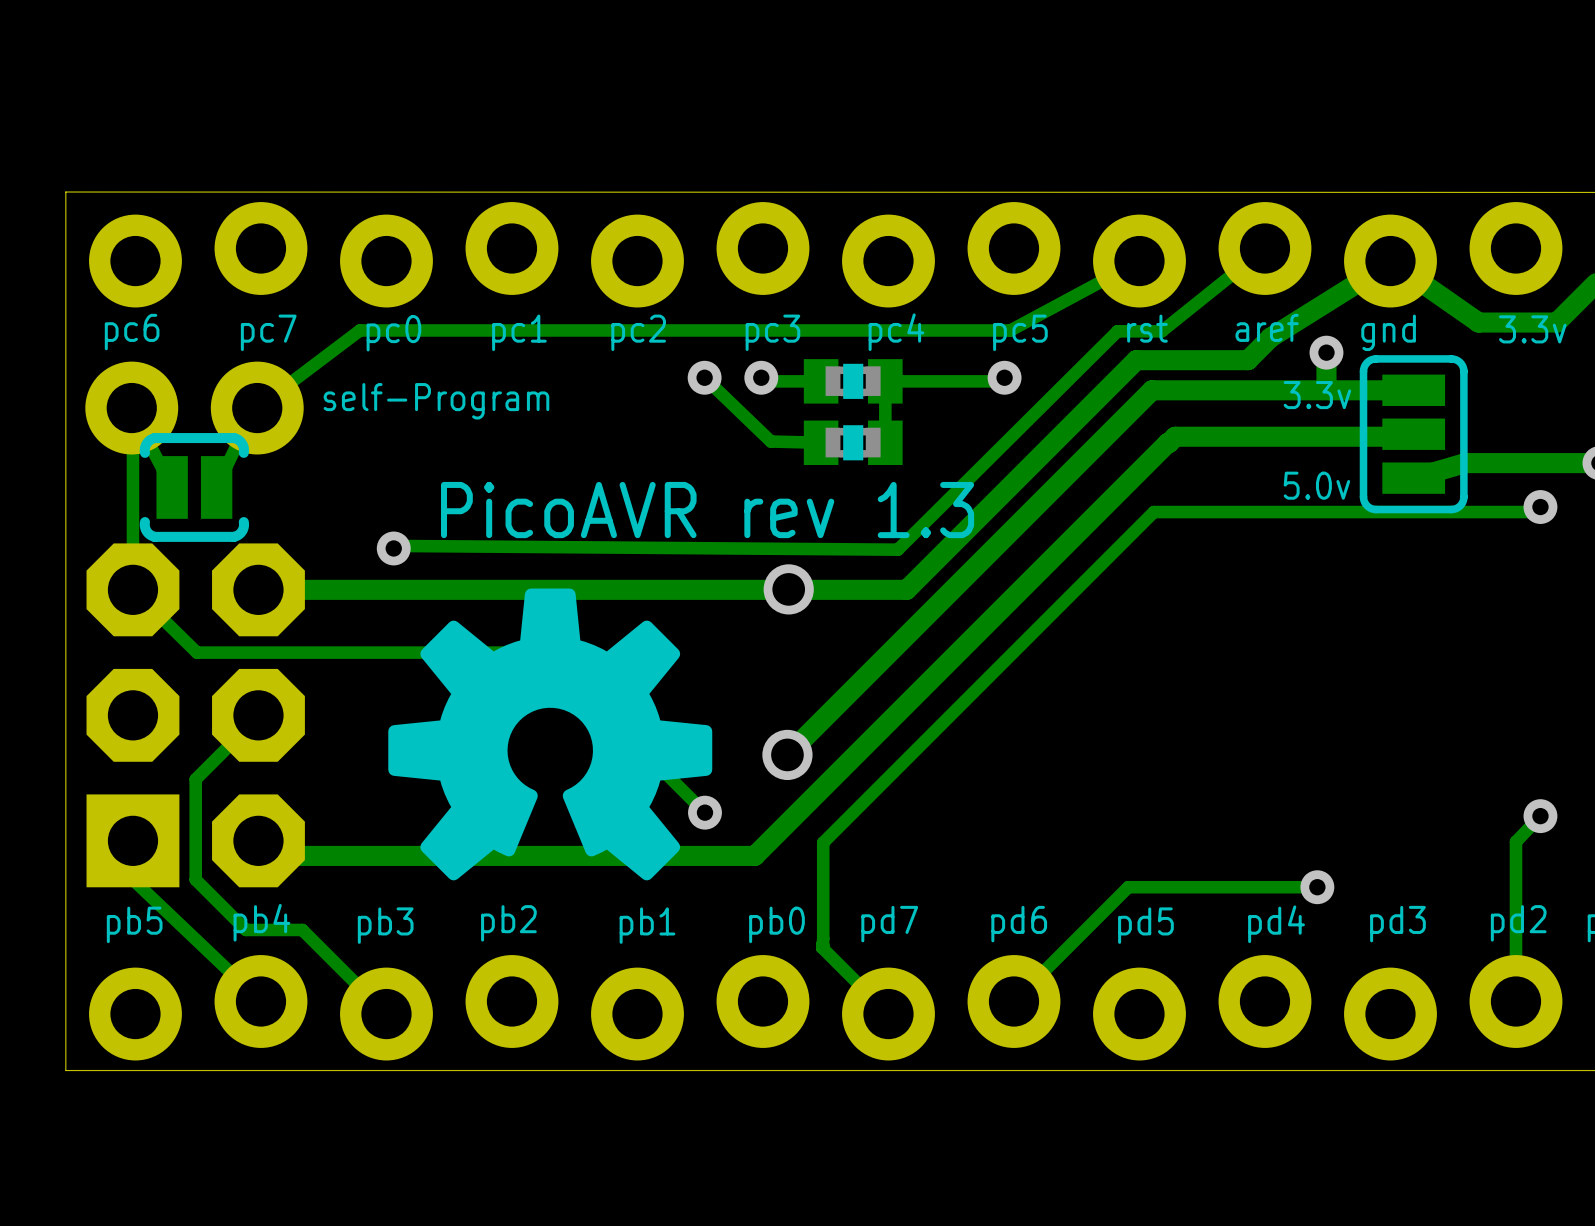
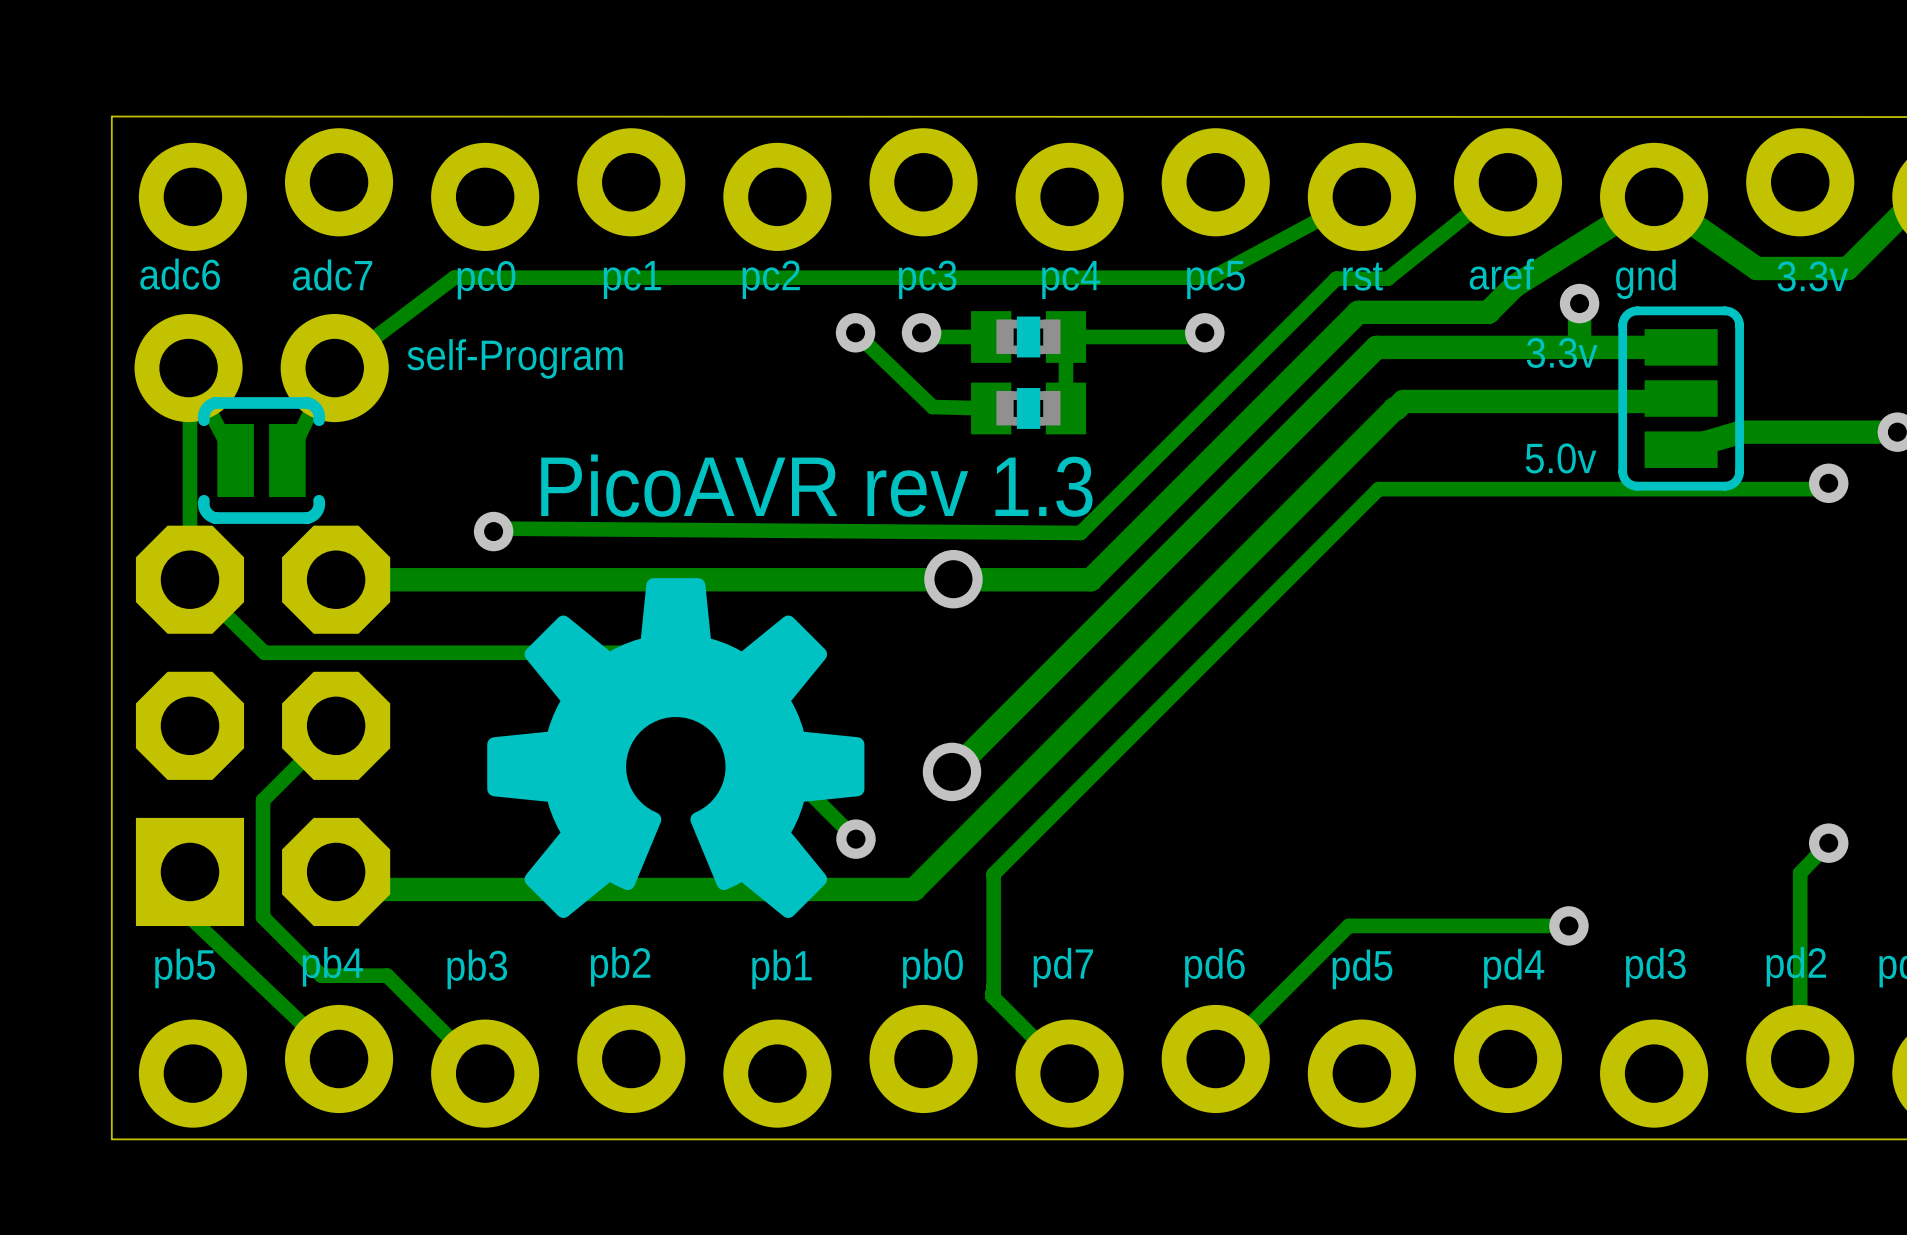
text: pc6 (132, 332) -> adc6 (180, 274)
text: pc7 (268, 332) -> adc7 (332, 275)

